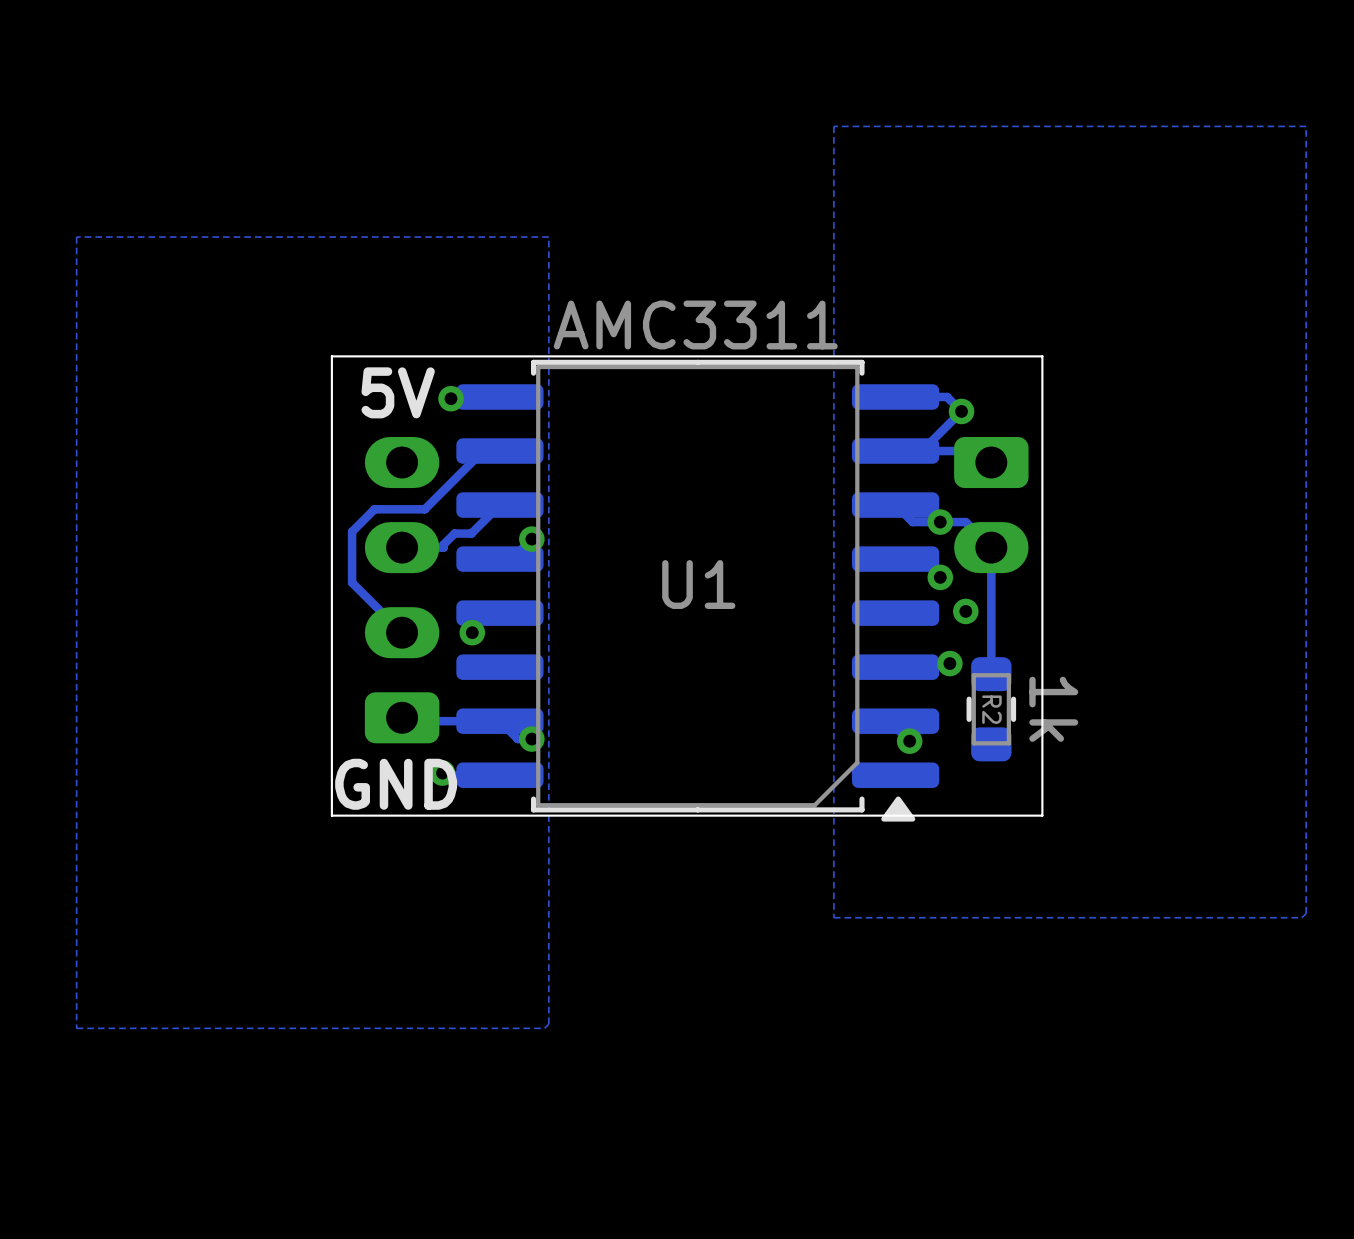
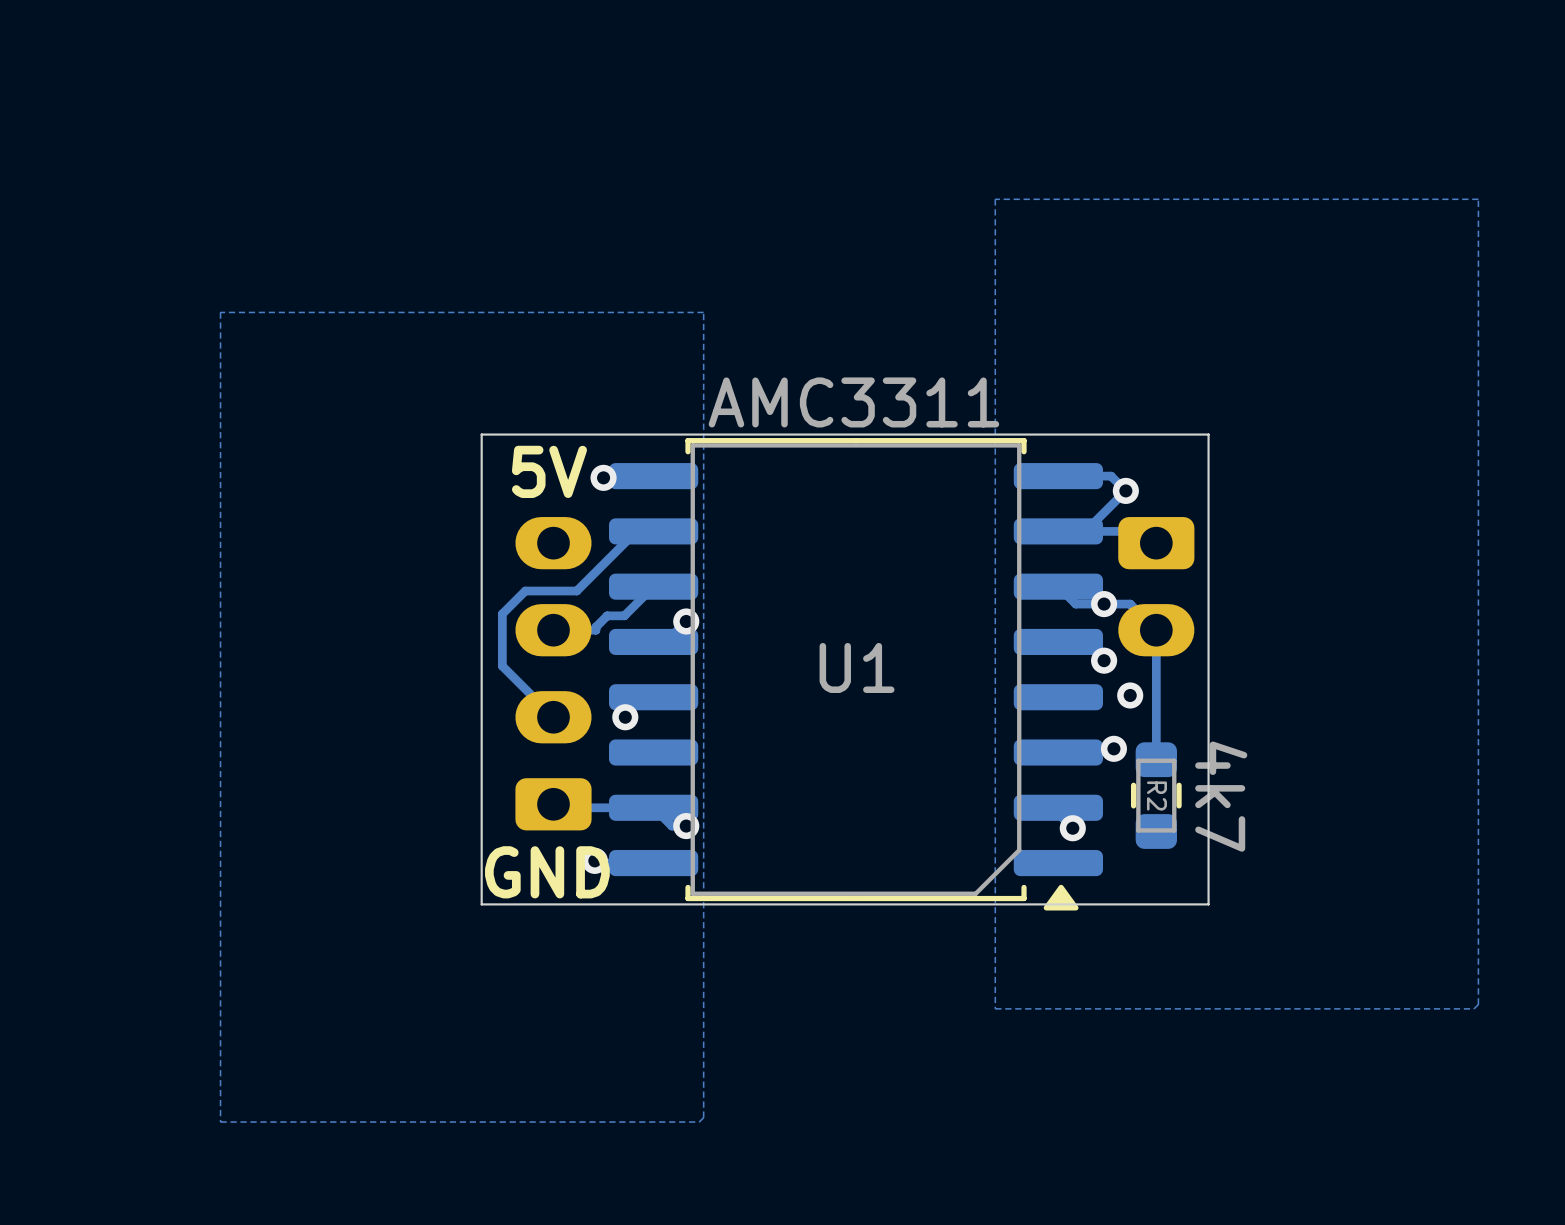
R2 value: 1k (1053, 709) -> 4k7 (1221, 796)

